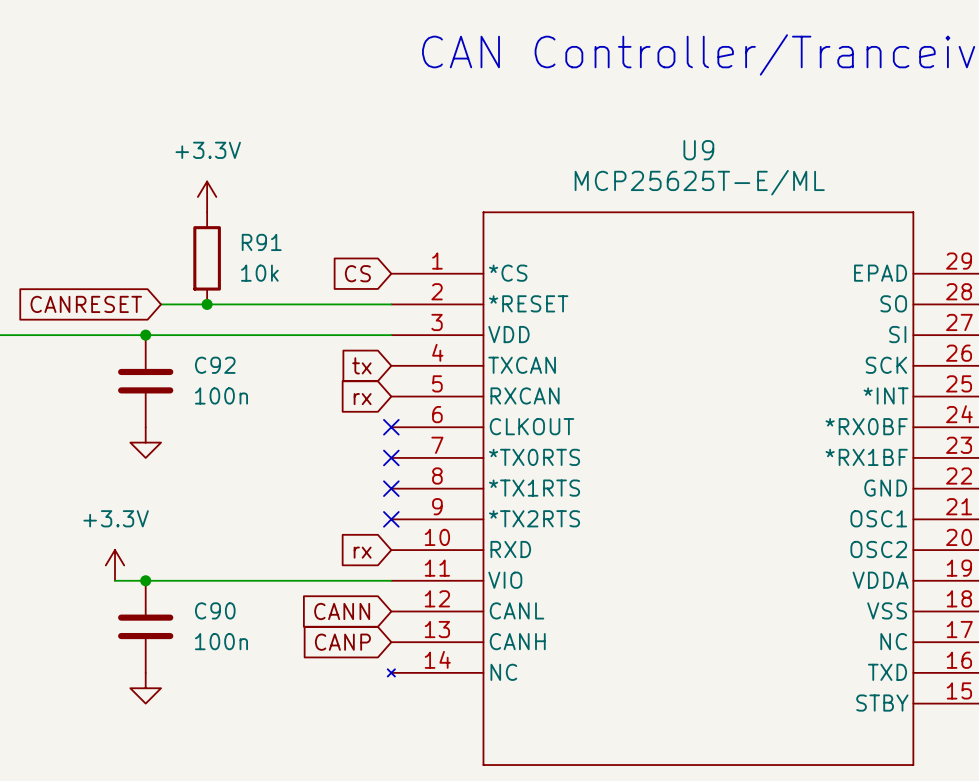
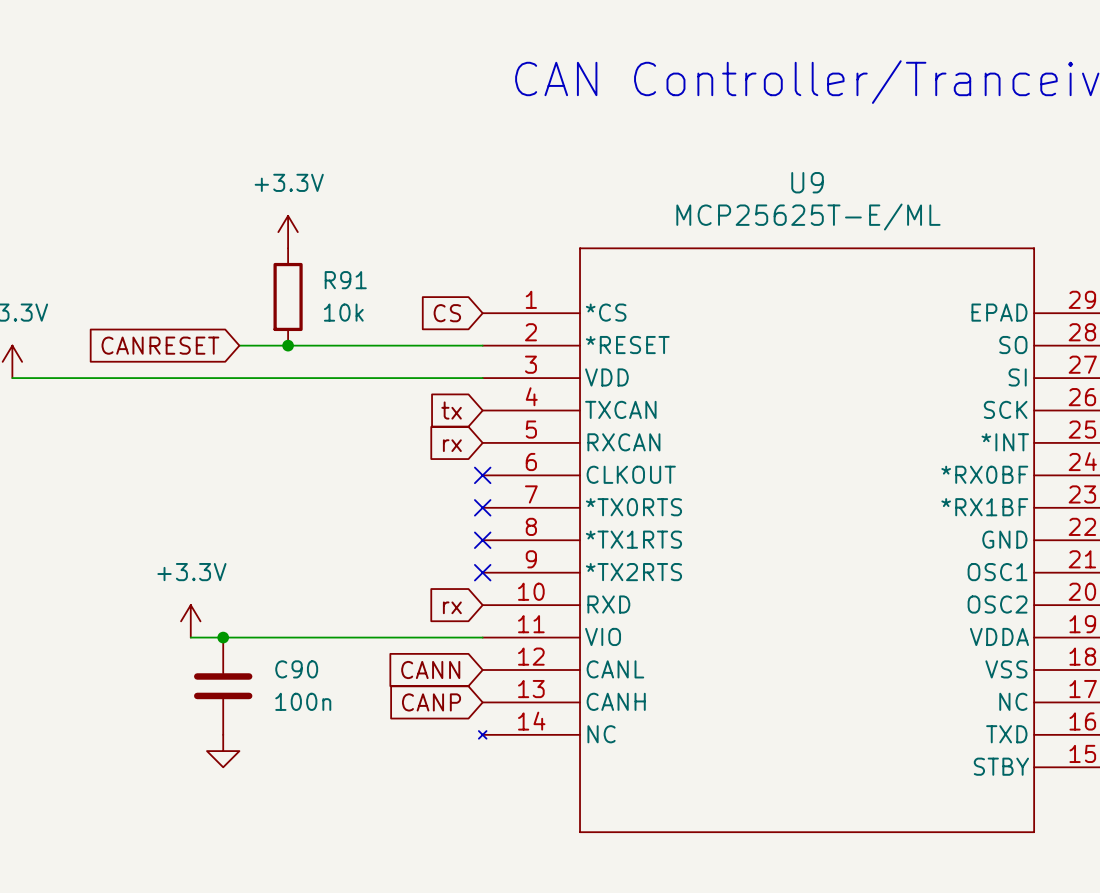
junction: (145, 335) -> none
C92: 100n (145, 381) -> none
power symbol: (145, 442) -> none

